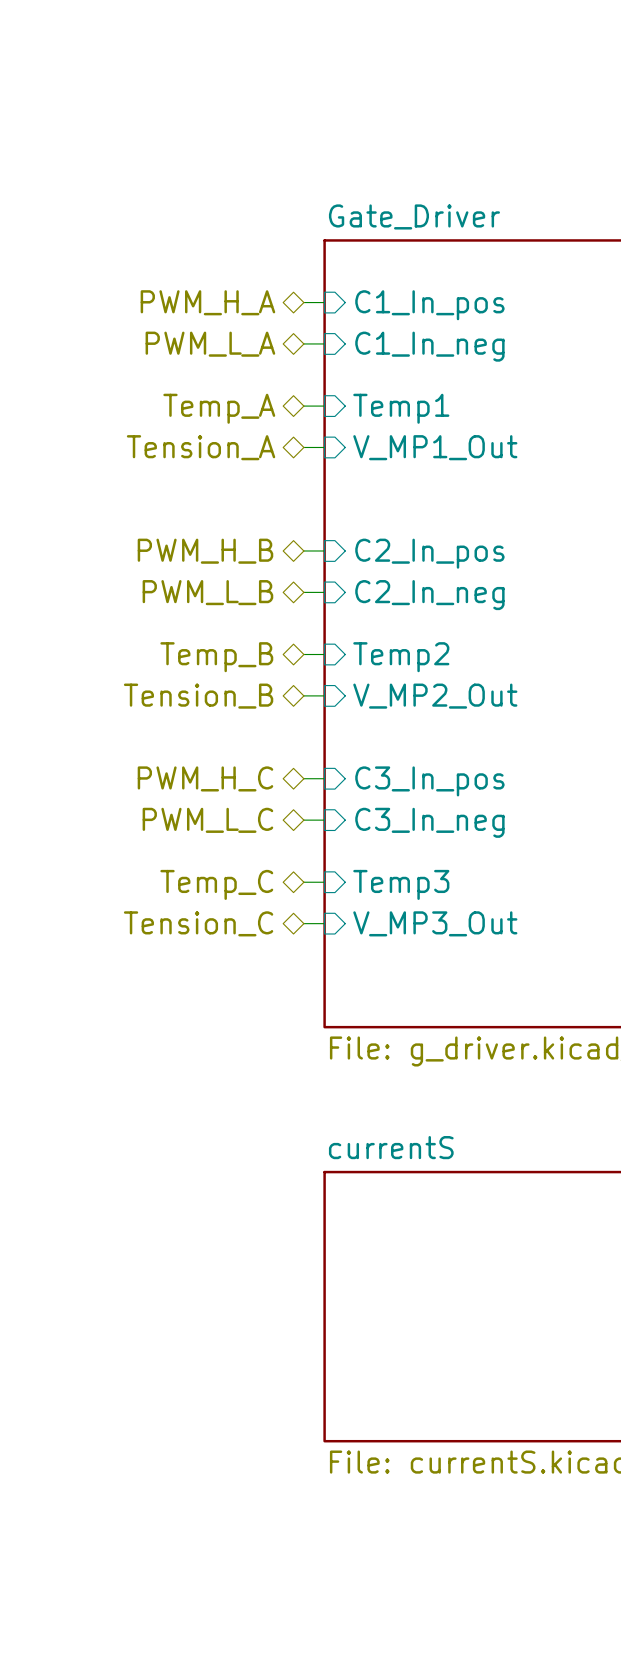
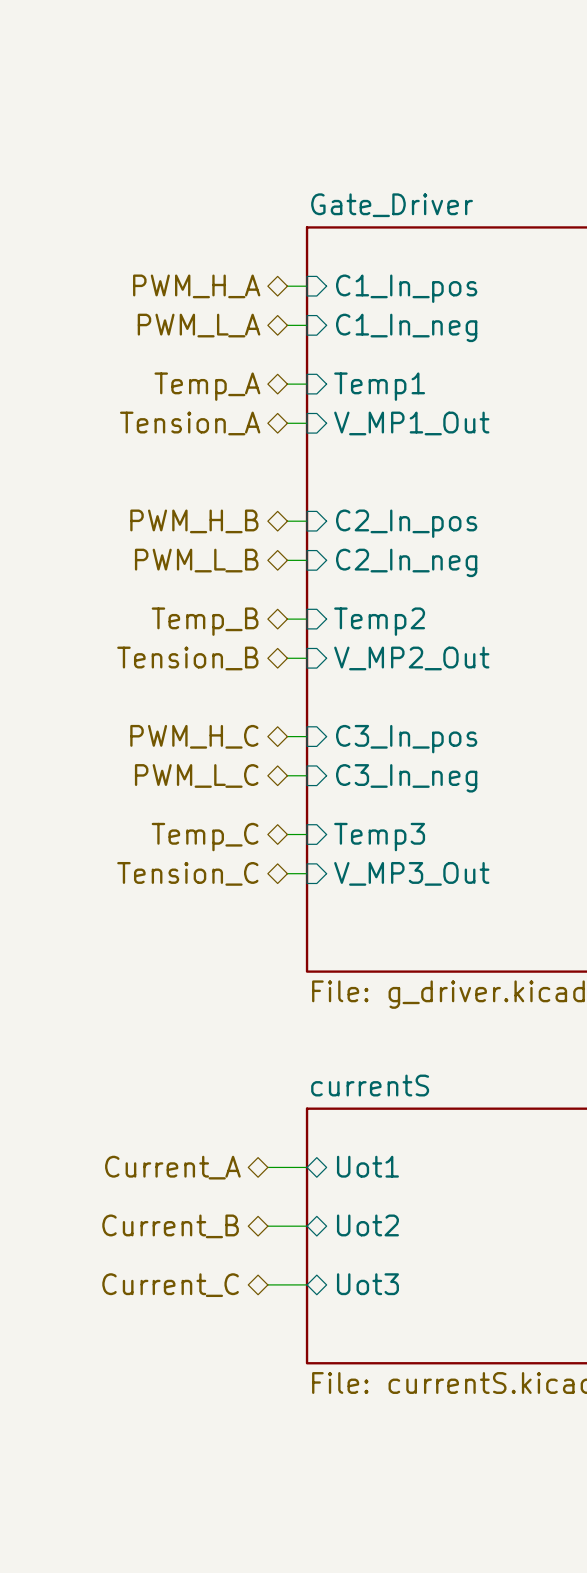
sheet pin: none -> Uot1 (367, 1166)
hierarchical label: none -> Current_A (172, 1167)
wire: none -> (267, 1167) (307, 1167)
sheet pin: none -> Uot2 (367, 1225)
hierarchical label: none -> Current_B (170, 1226)
wire: none -> (267, 1226) (307, 1226)
sheet pin: none -> Uot3 (367, 1284)
hierarchical label: none -> Current_C (170, 1285)
wire: none -> (267, 1284) (307, 1284)

